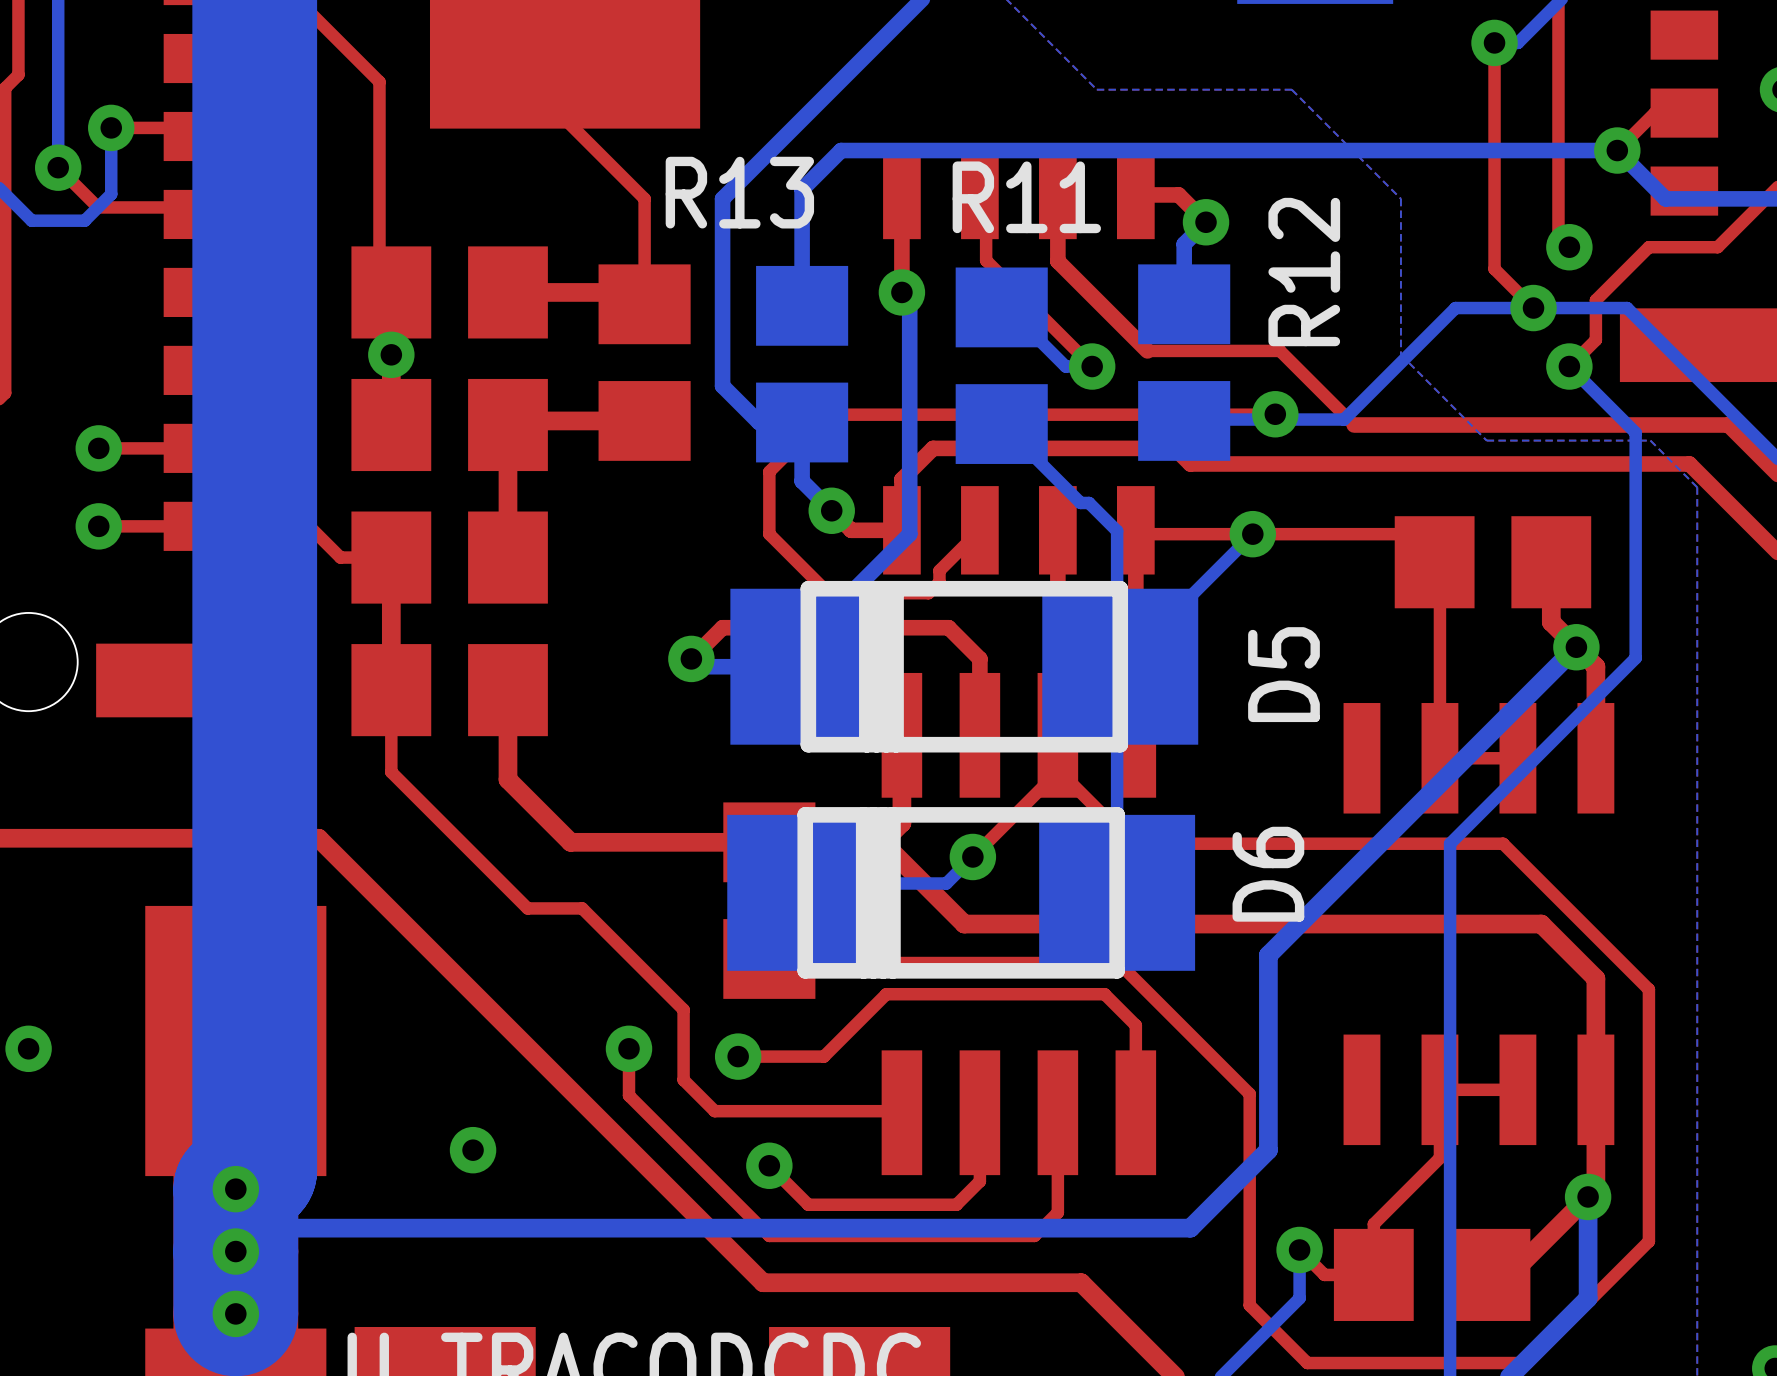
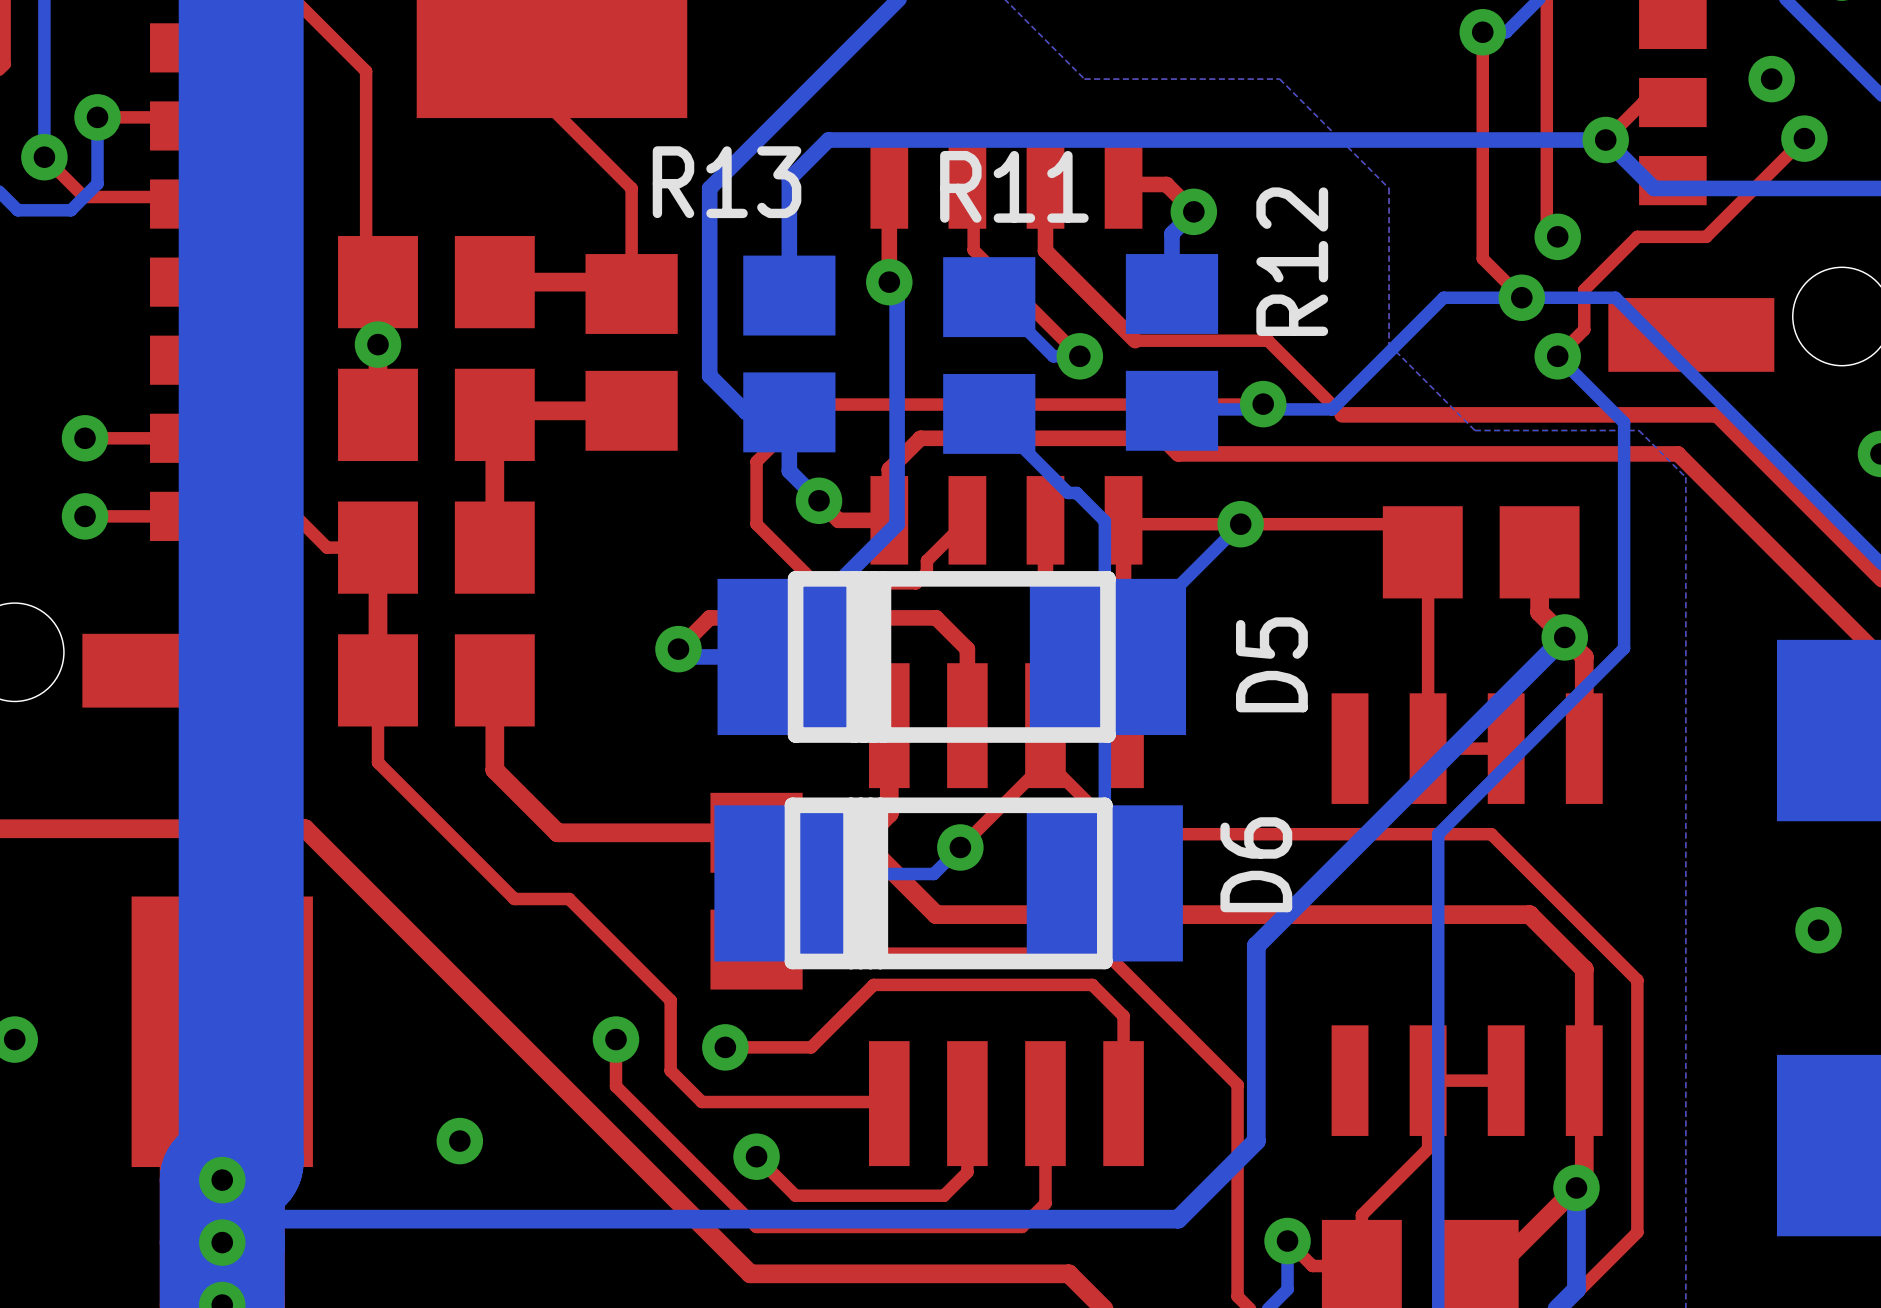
top track: (882, 842) (964, 924) -> (854, 832) (936, 914) (951, 914)

